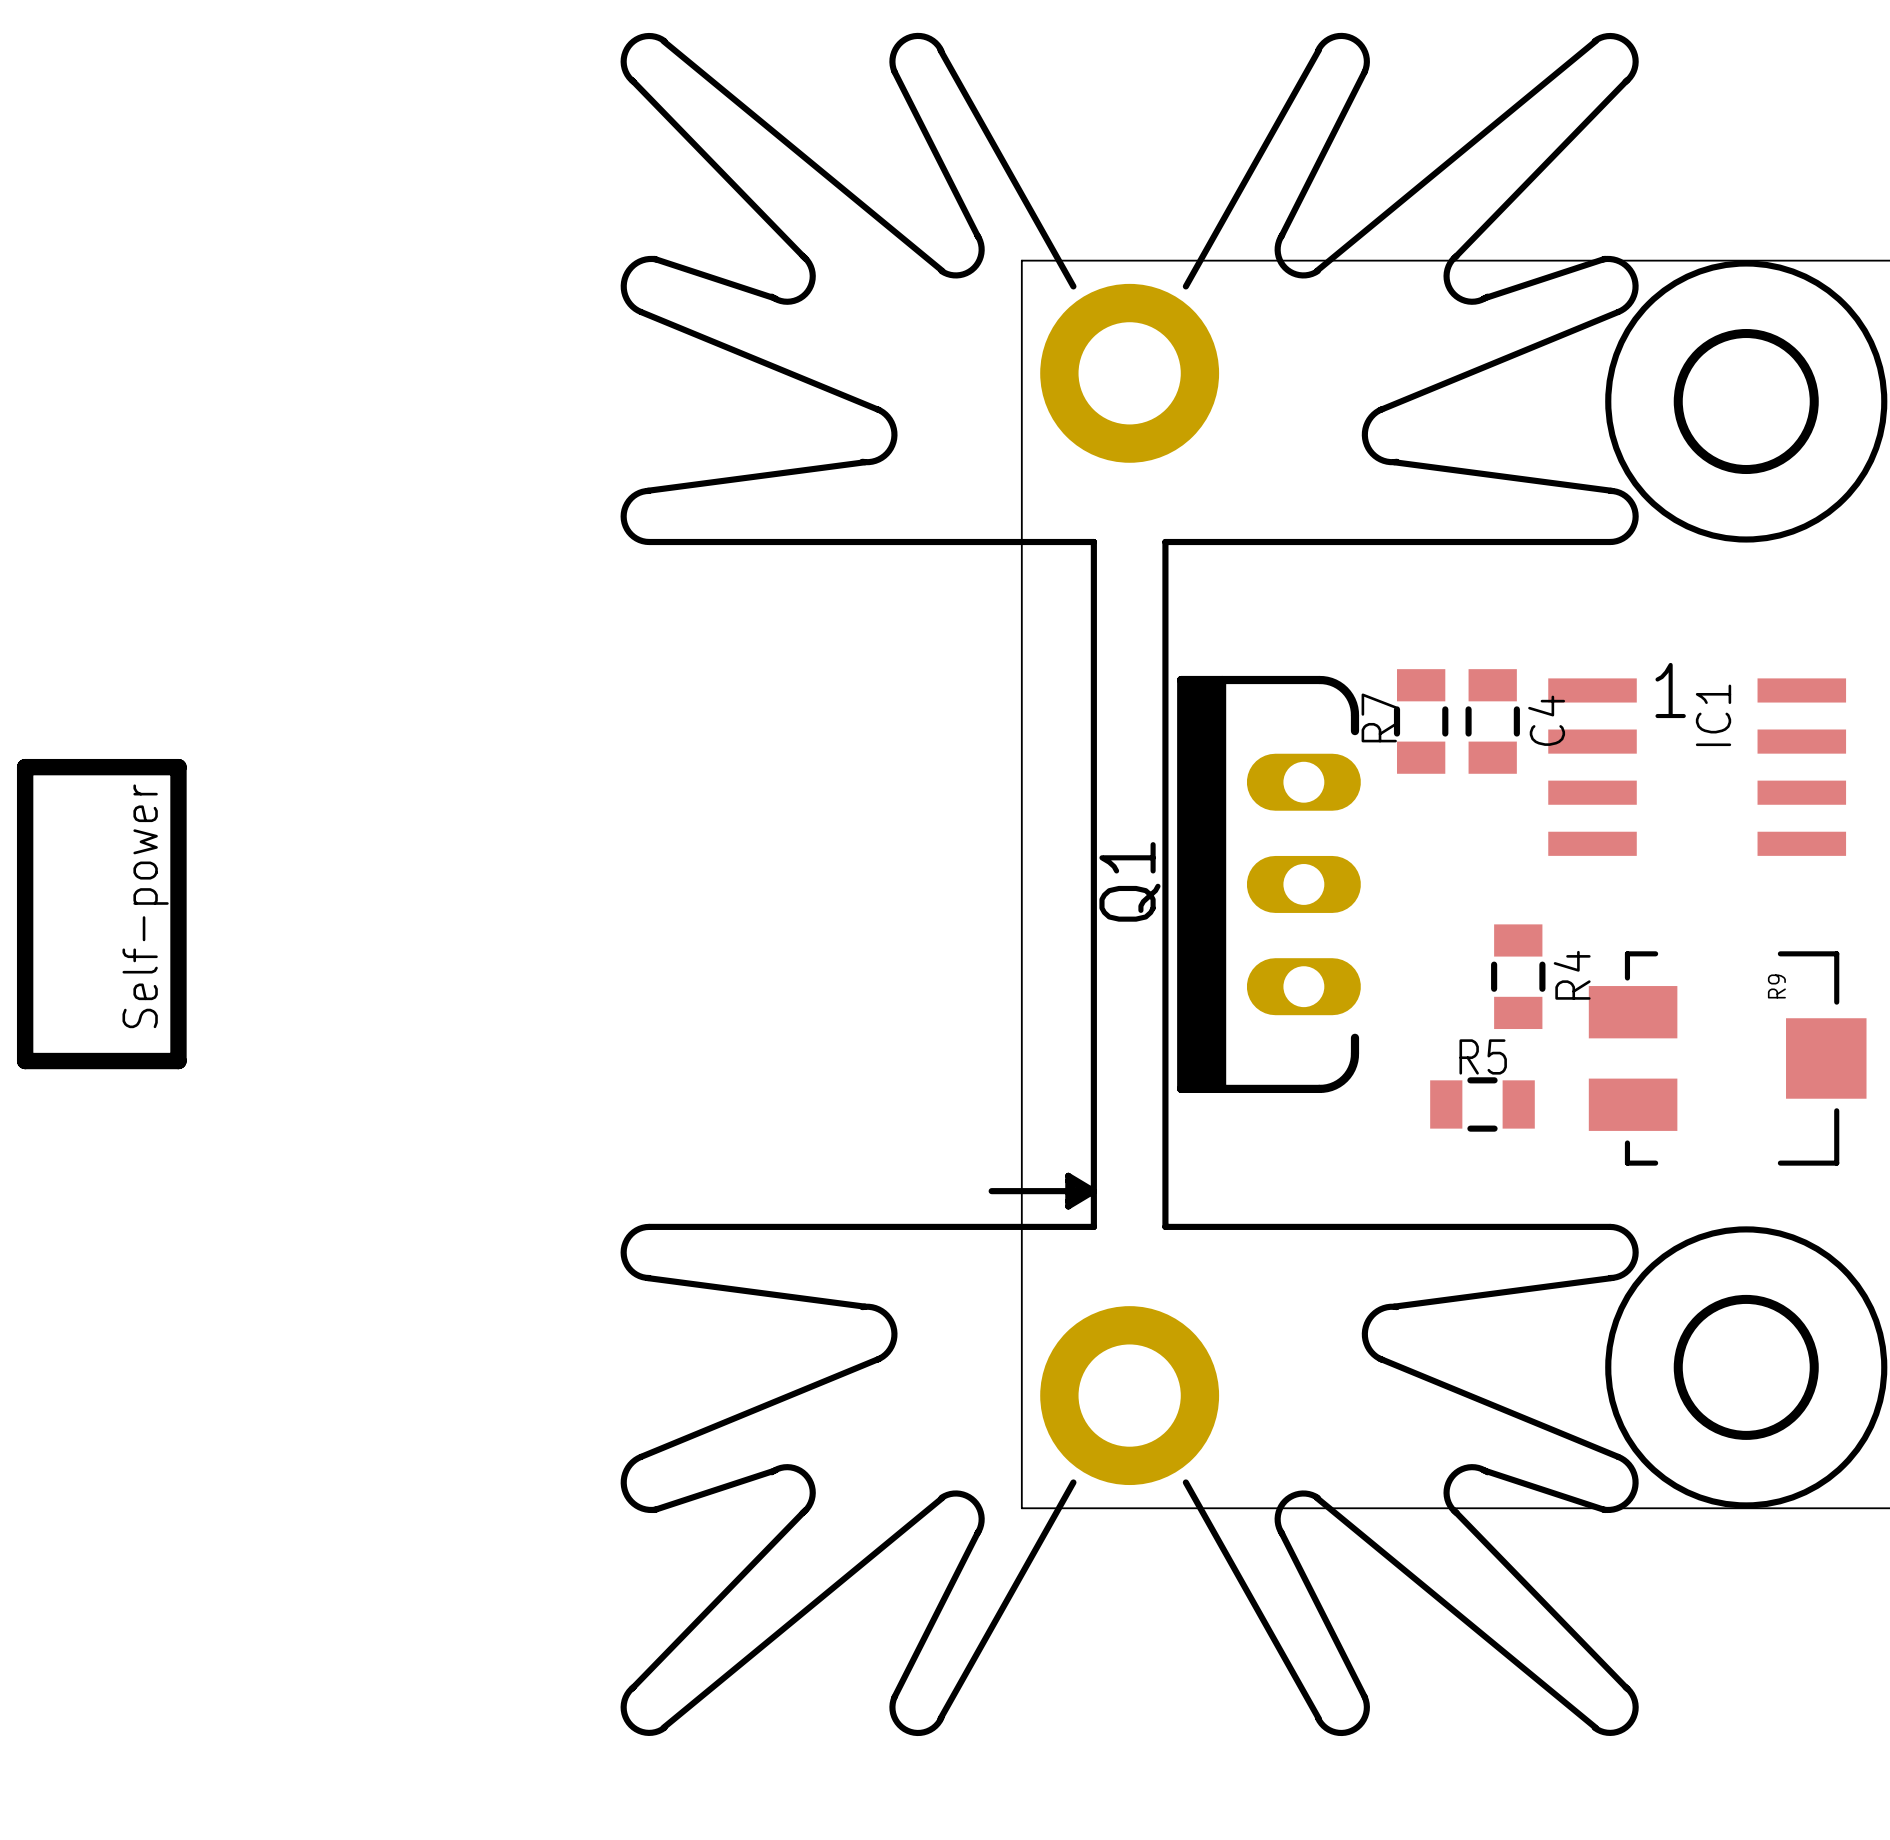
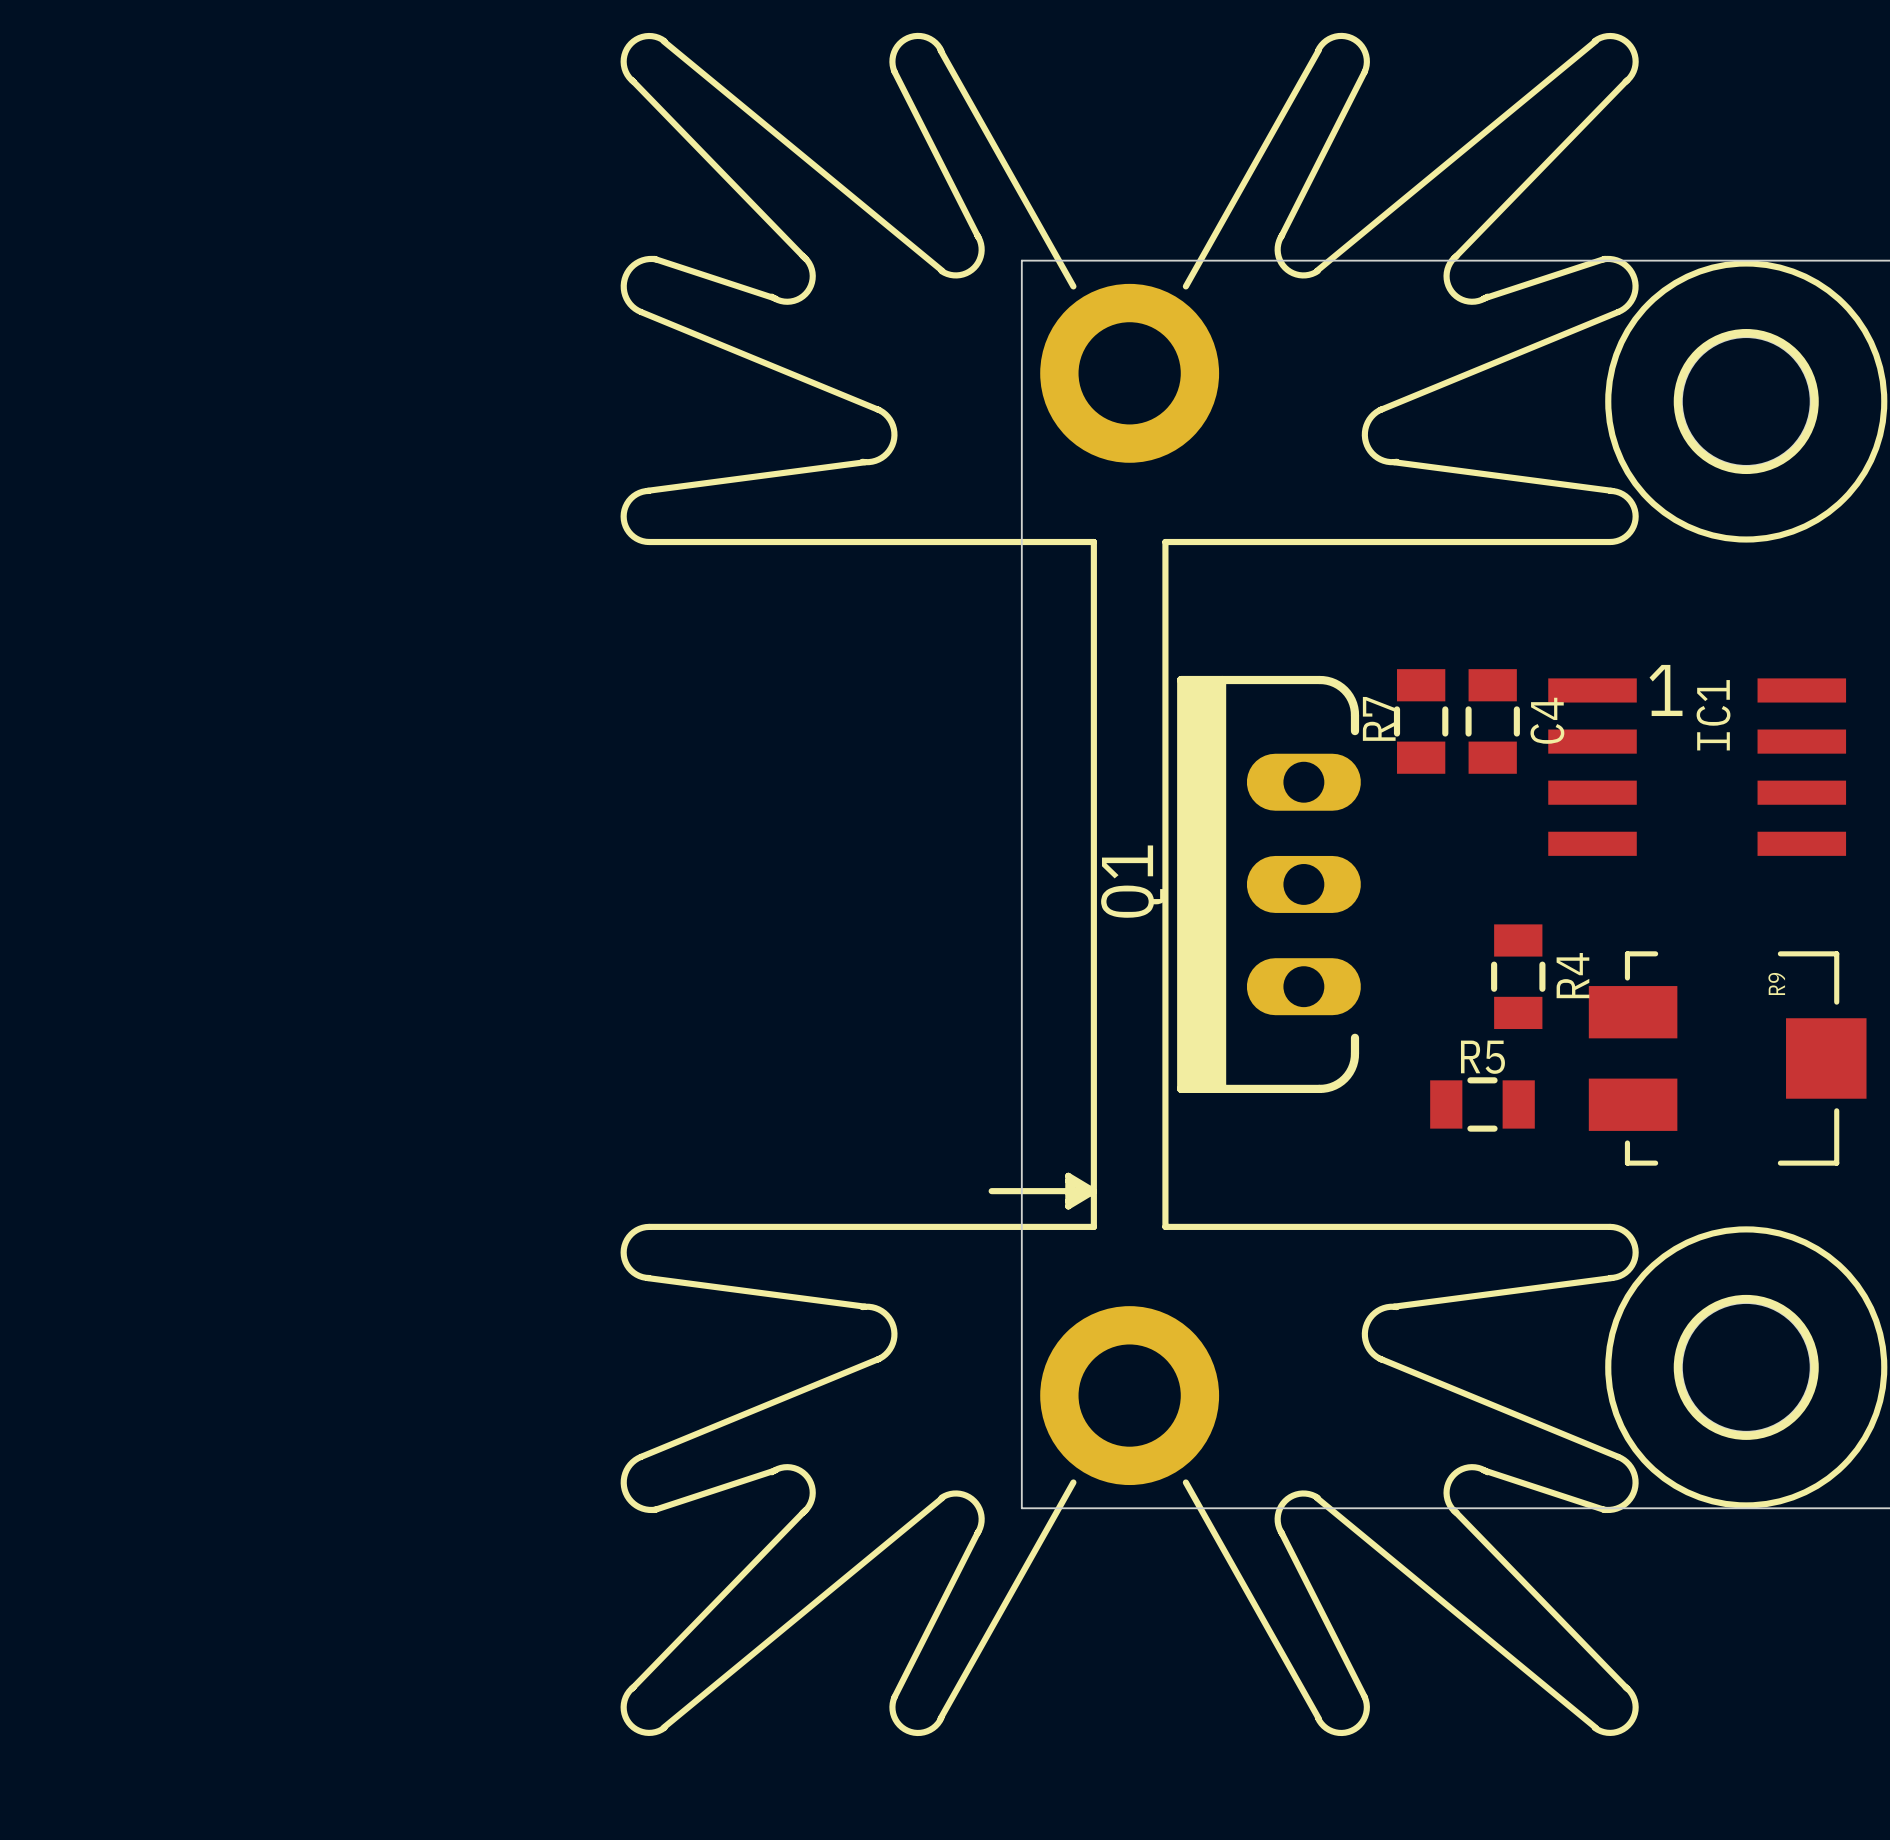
line: (25, 767) (25, 1061) (178, 1061) (178, 767) (25, 767) -> none
text: Self-power (145, 906) -> none

